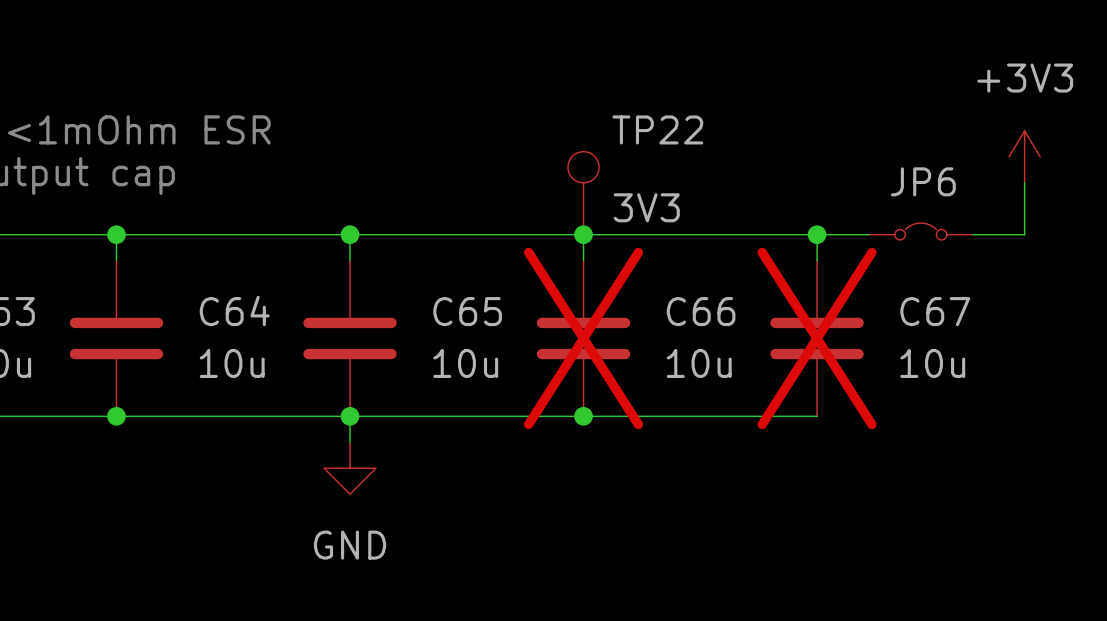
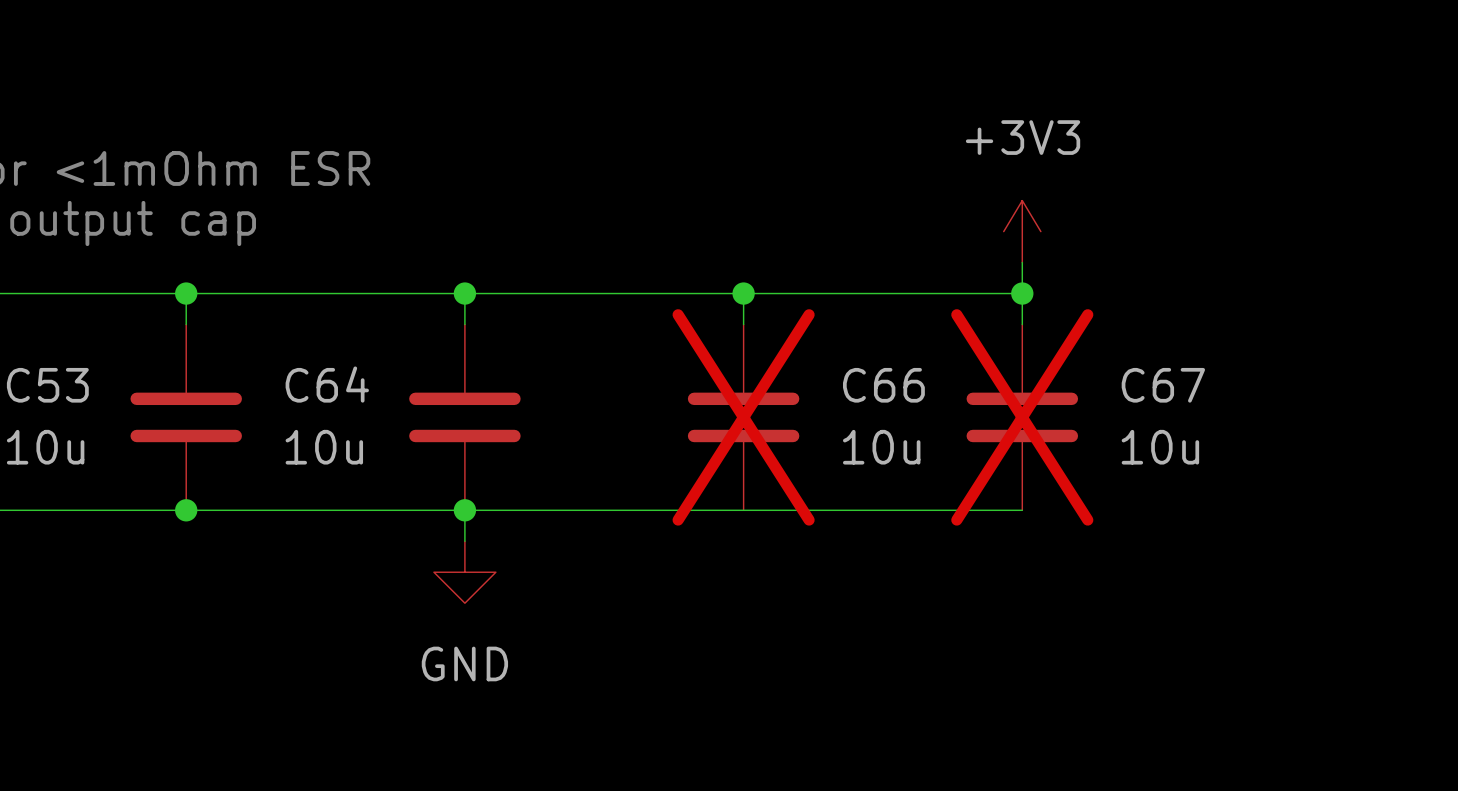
power symbol position: +3V3 (1024, 156) -> +3V3 (1022, 231)
wire: (1024, 182) (1024, 234) (972, 234) -> none
TP22: 3V3 (583, 193) -> none
JP6: (920, 231) -> none
wire: (817, 234) (868, 234) -> (1022, 293) (1022, 262)
C65 name: C65 (467, 311) -> none
C65 value: 10u (465, 363) -> none
junction: (583, 416) -> none

